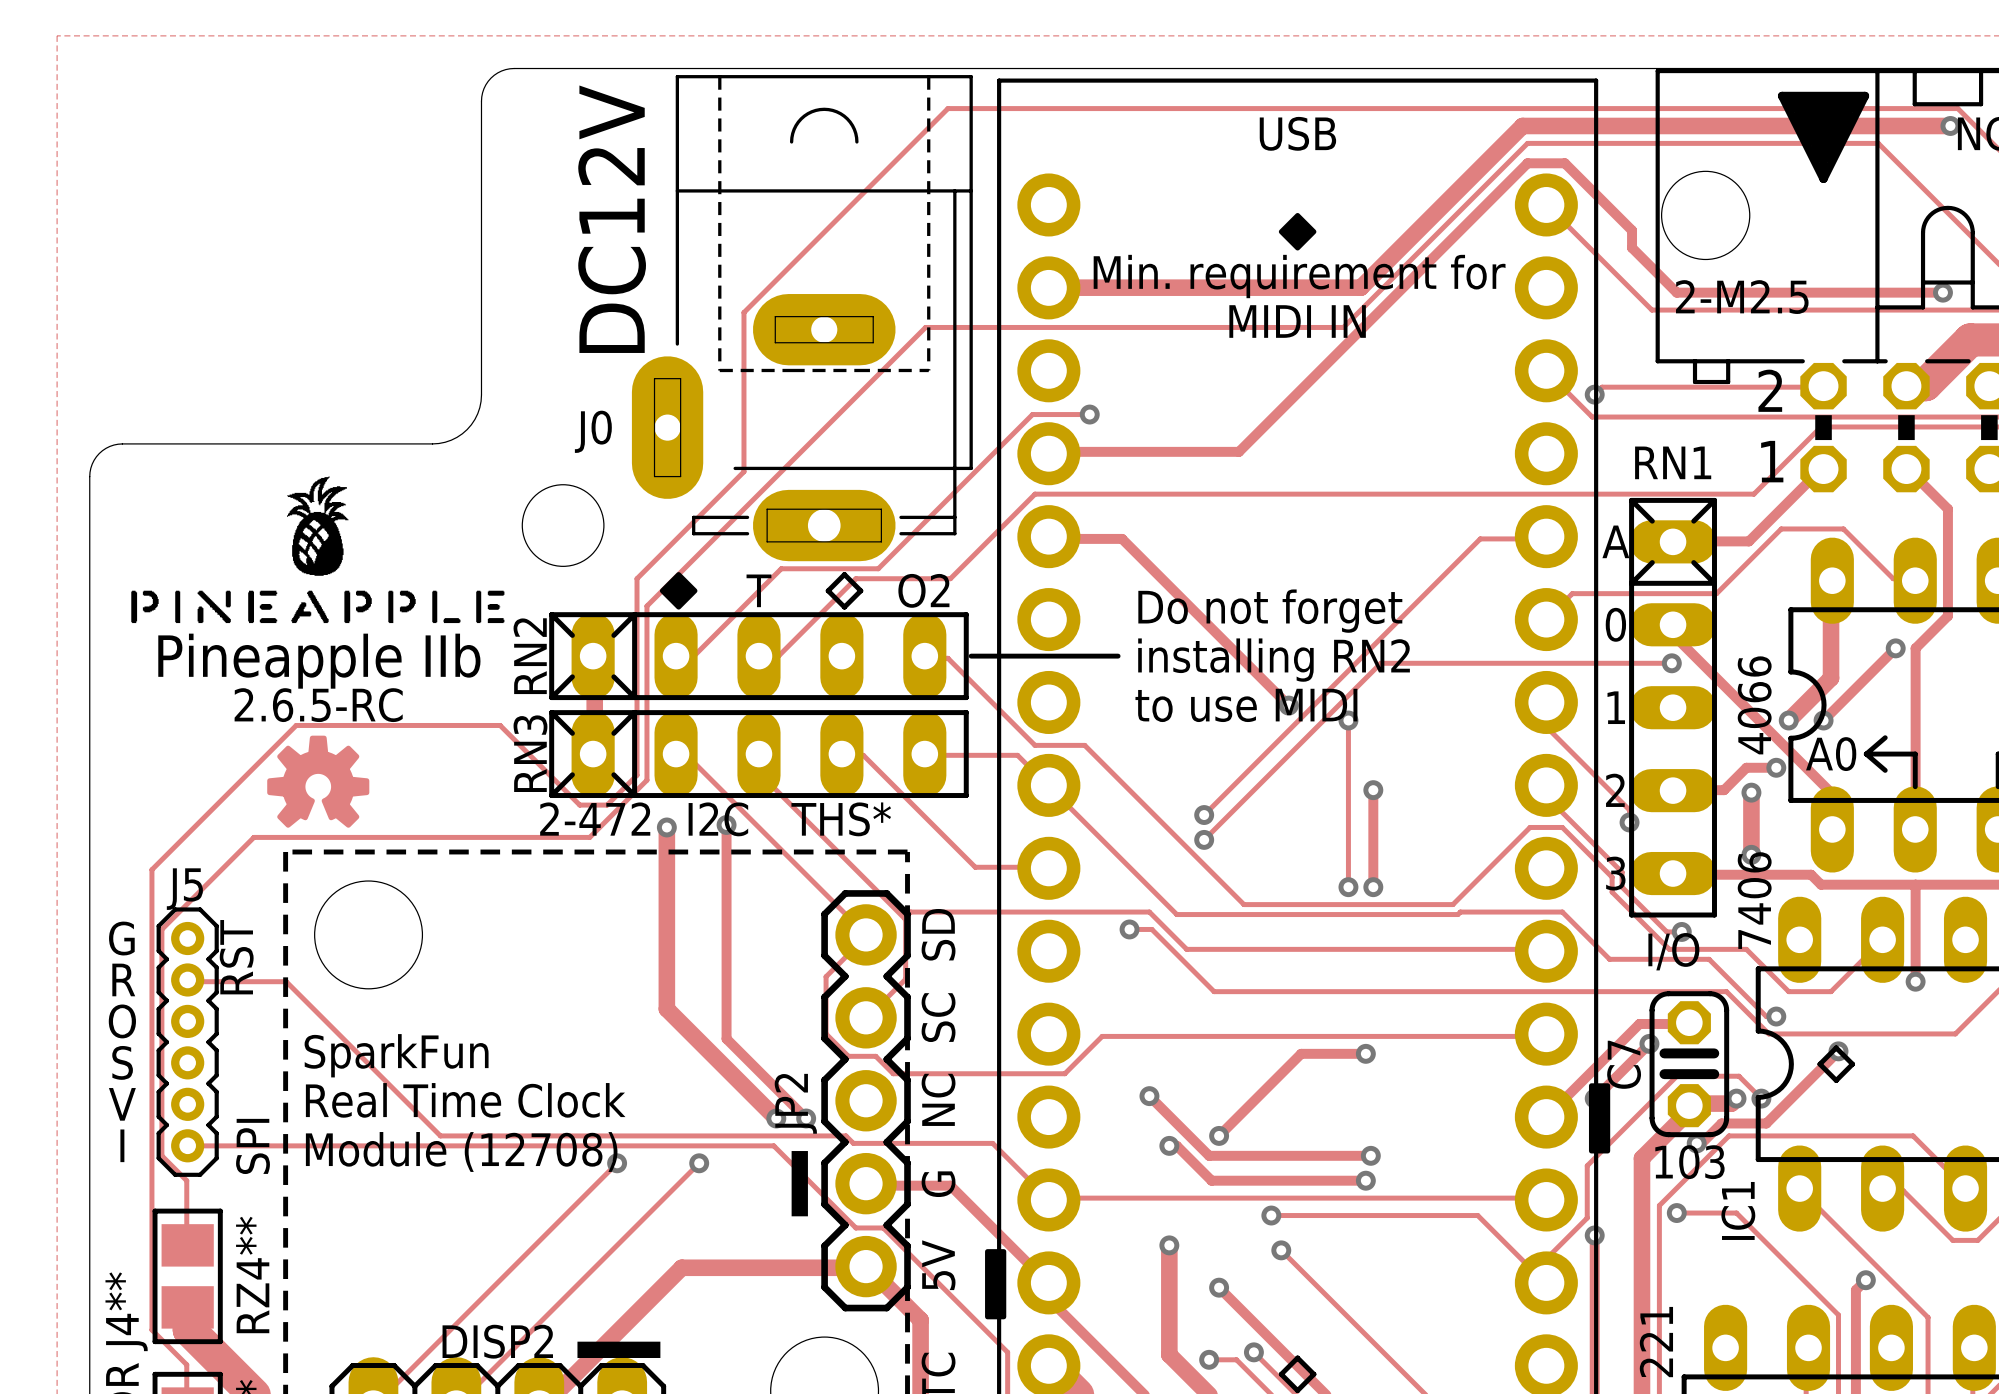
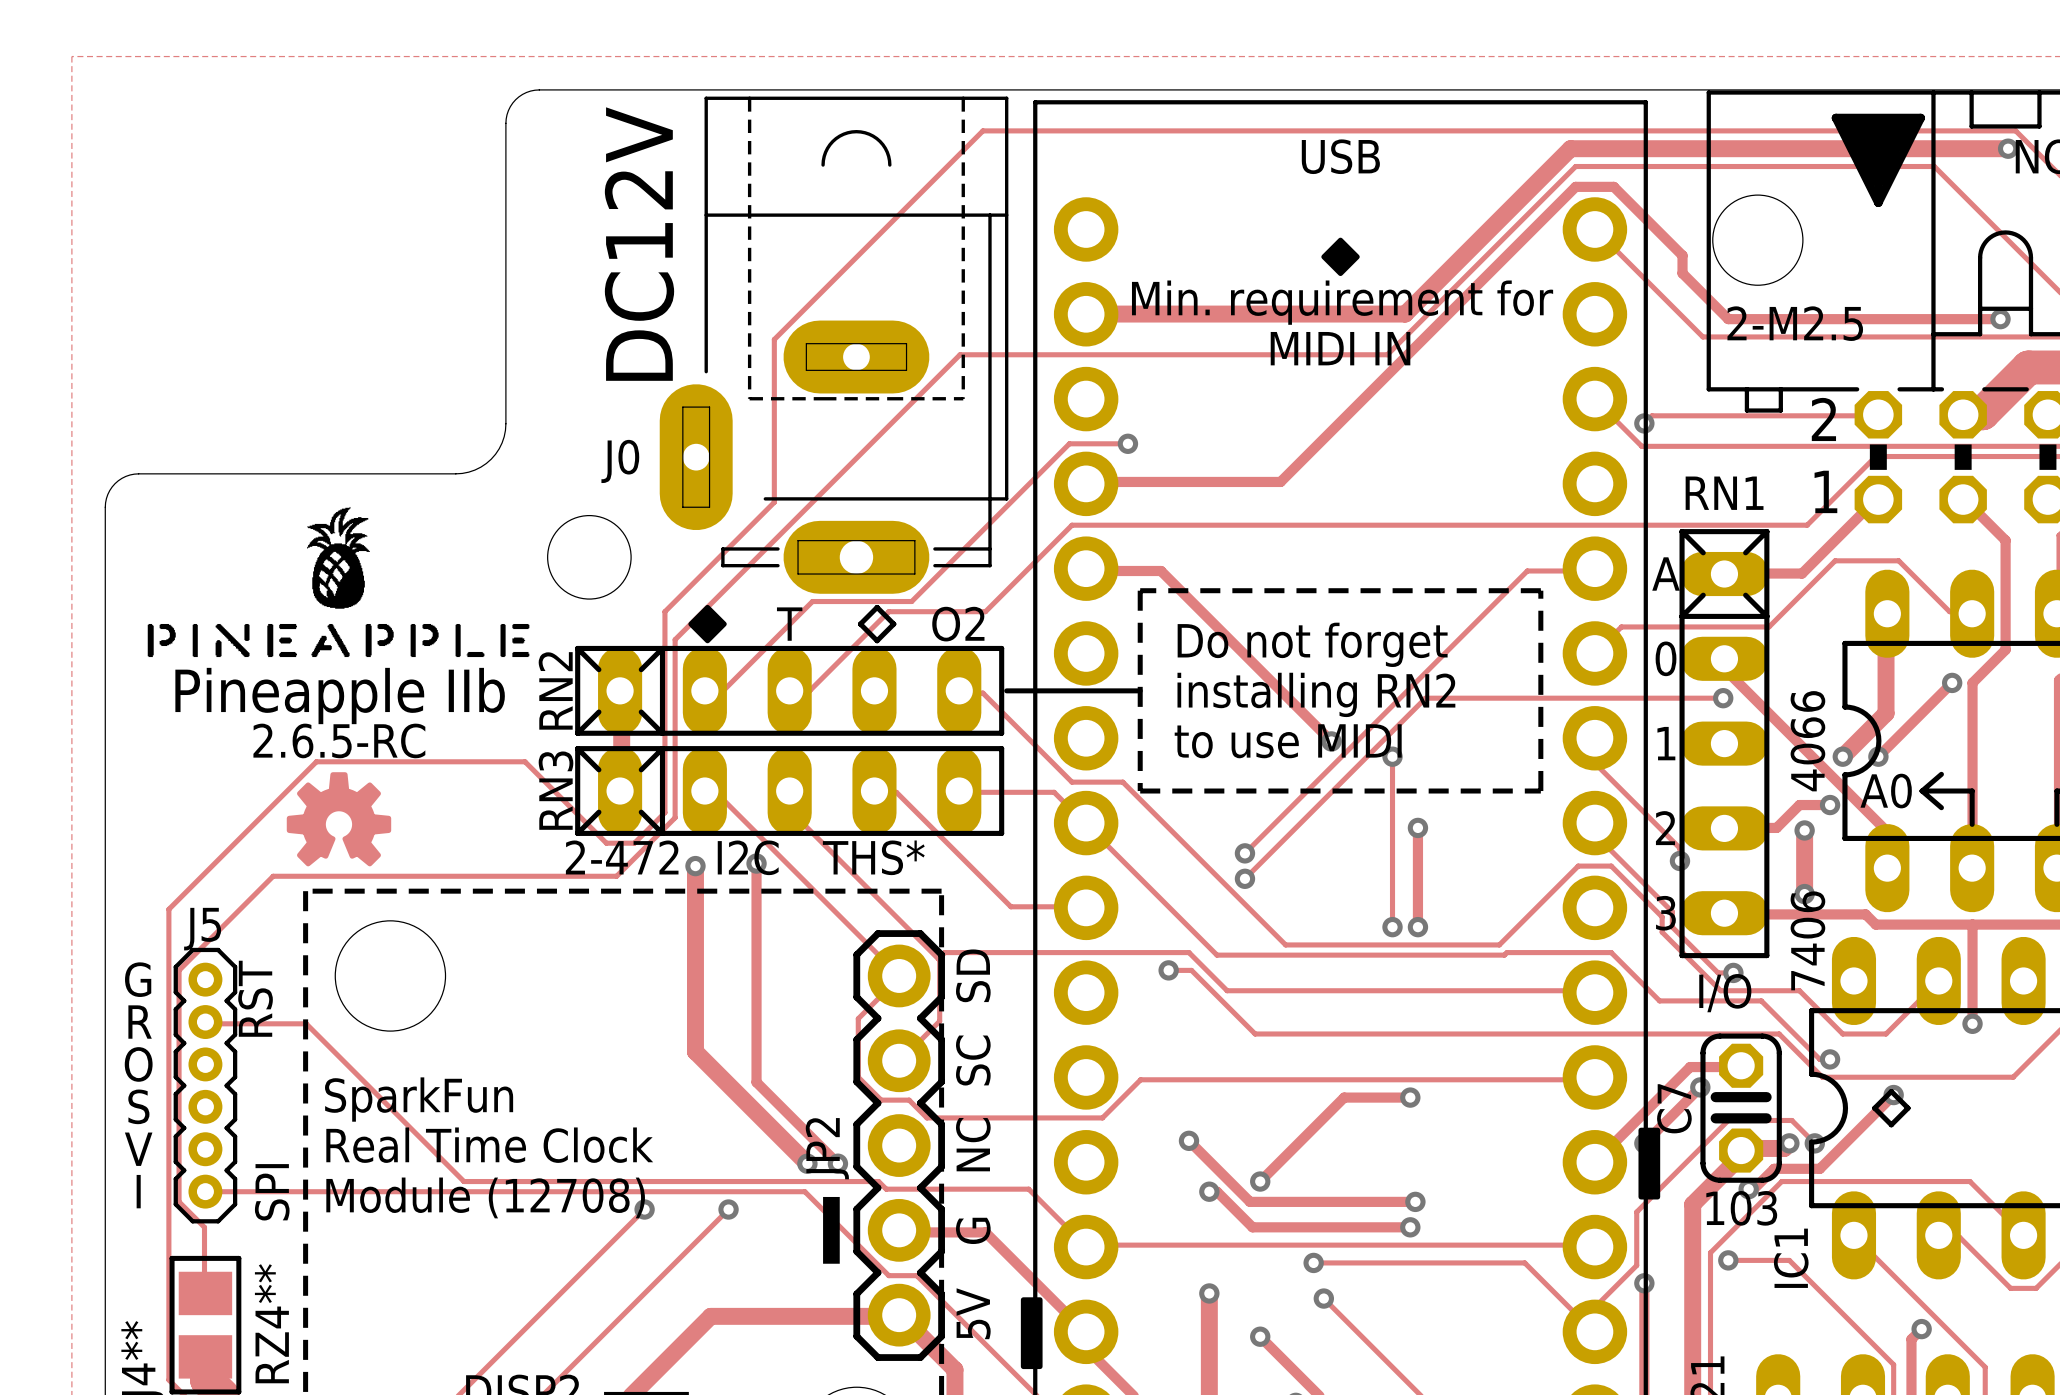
line: none -> (1140, 590) (1140, 791) (1540, 791) (1540, 590) (1140, 590)
line: (1101, 656) (1118, 656) -> none

